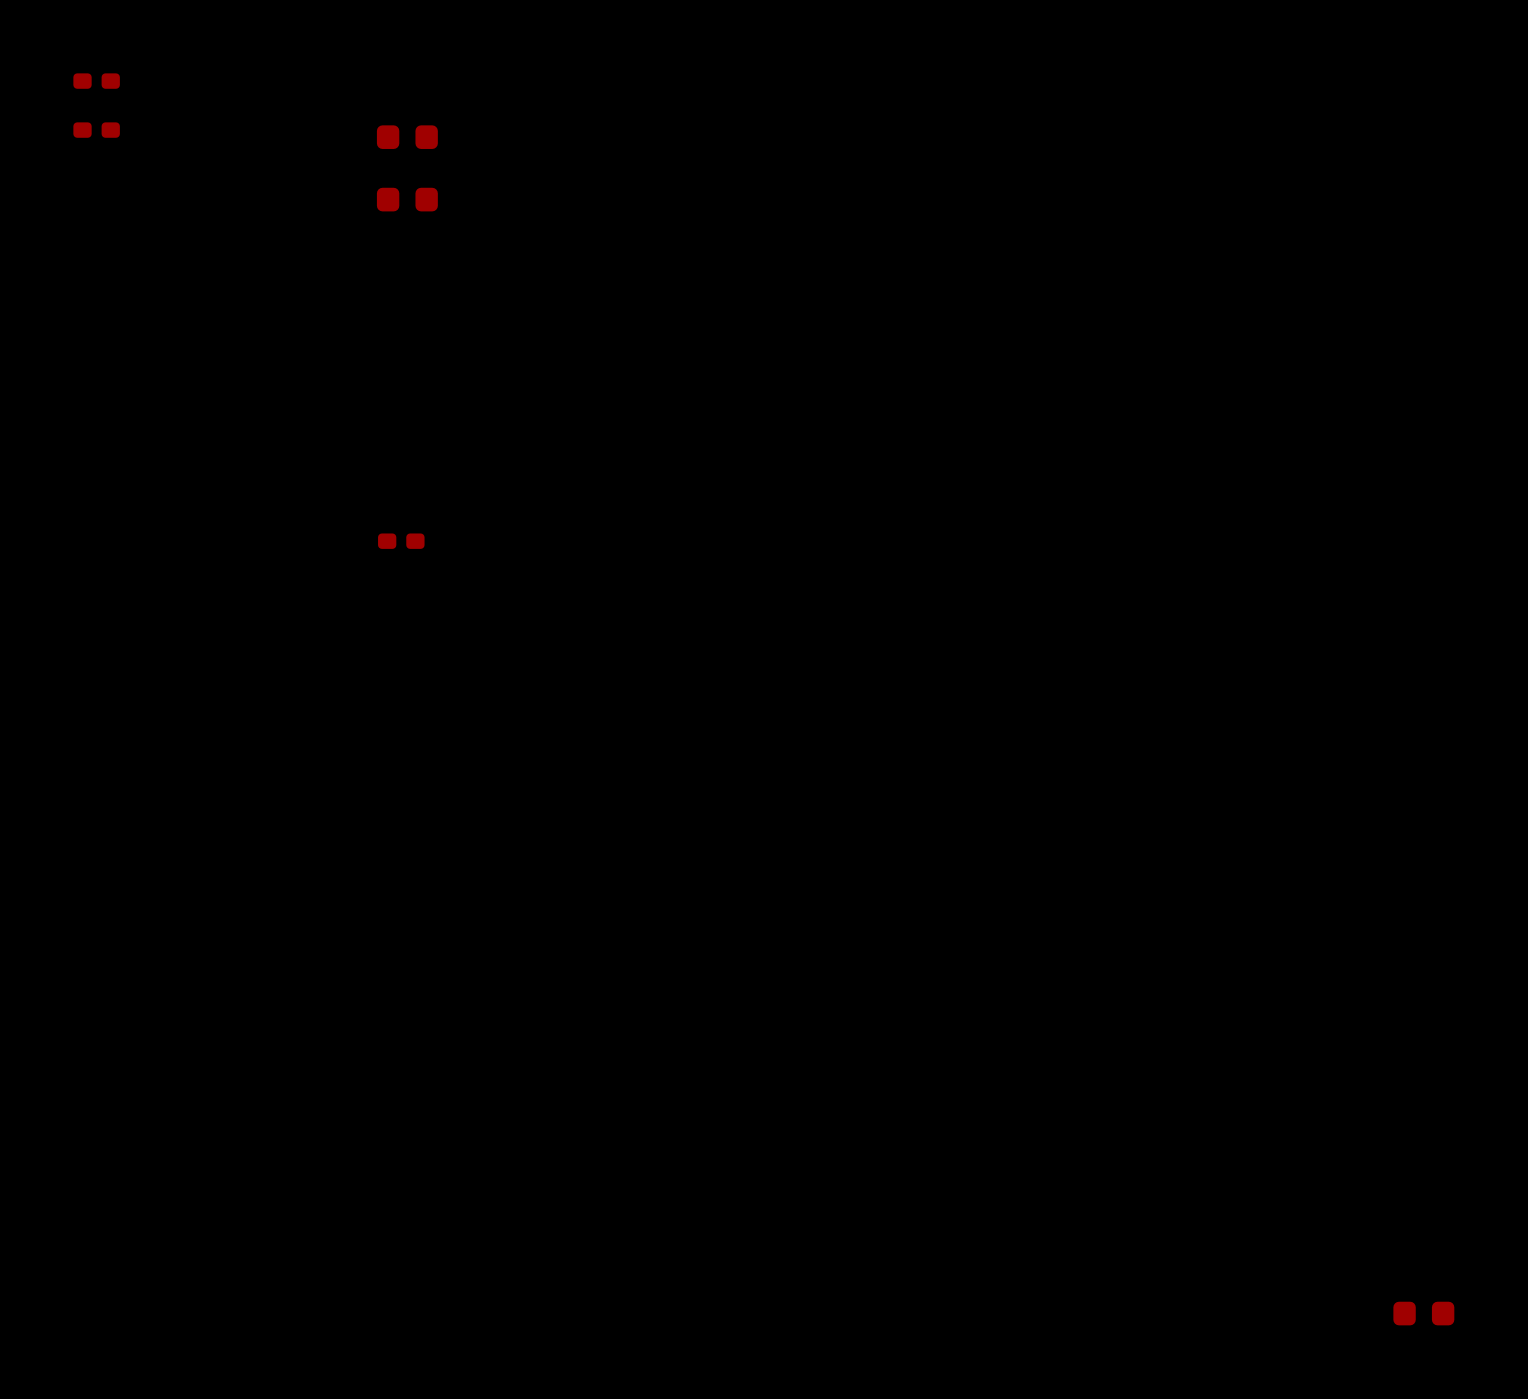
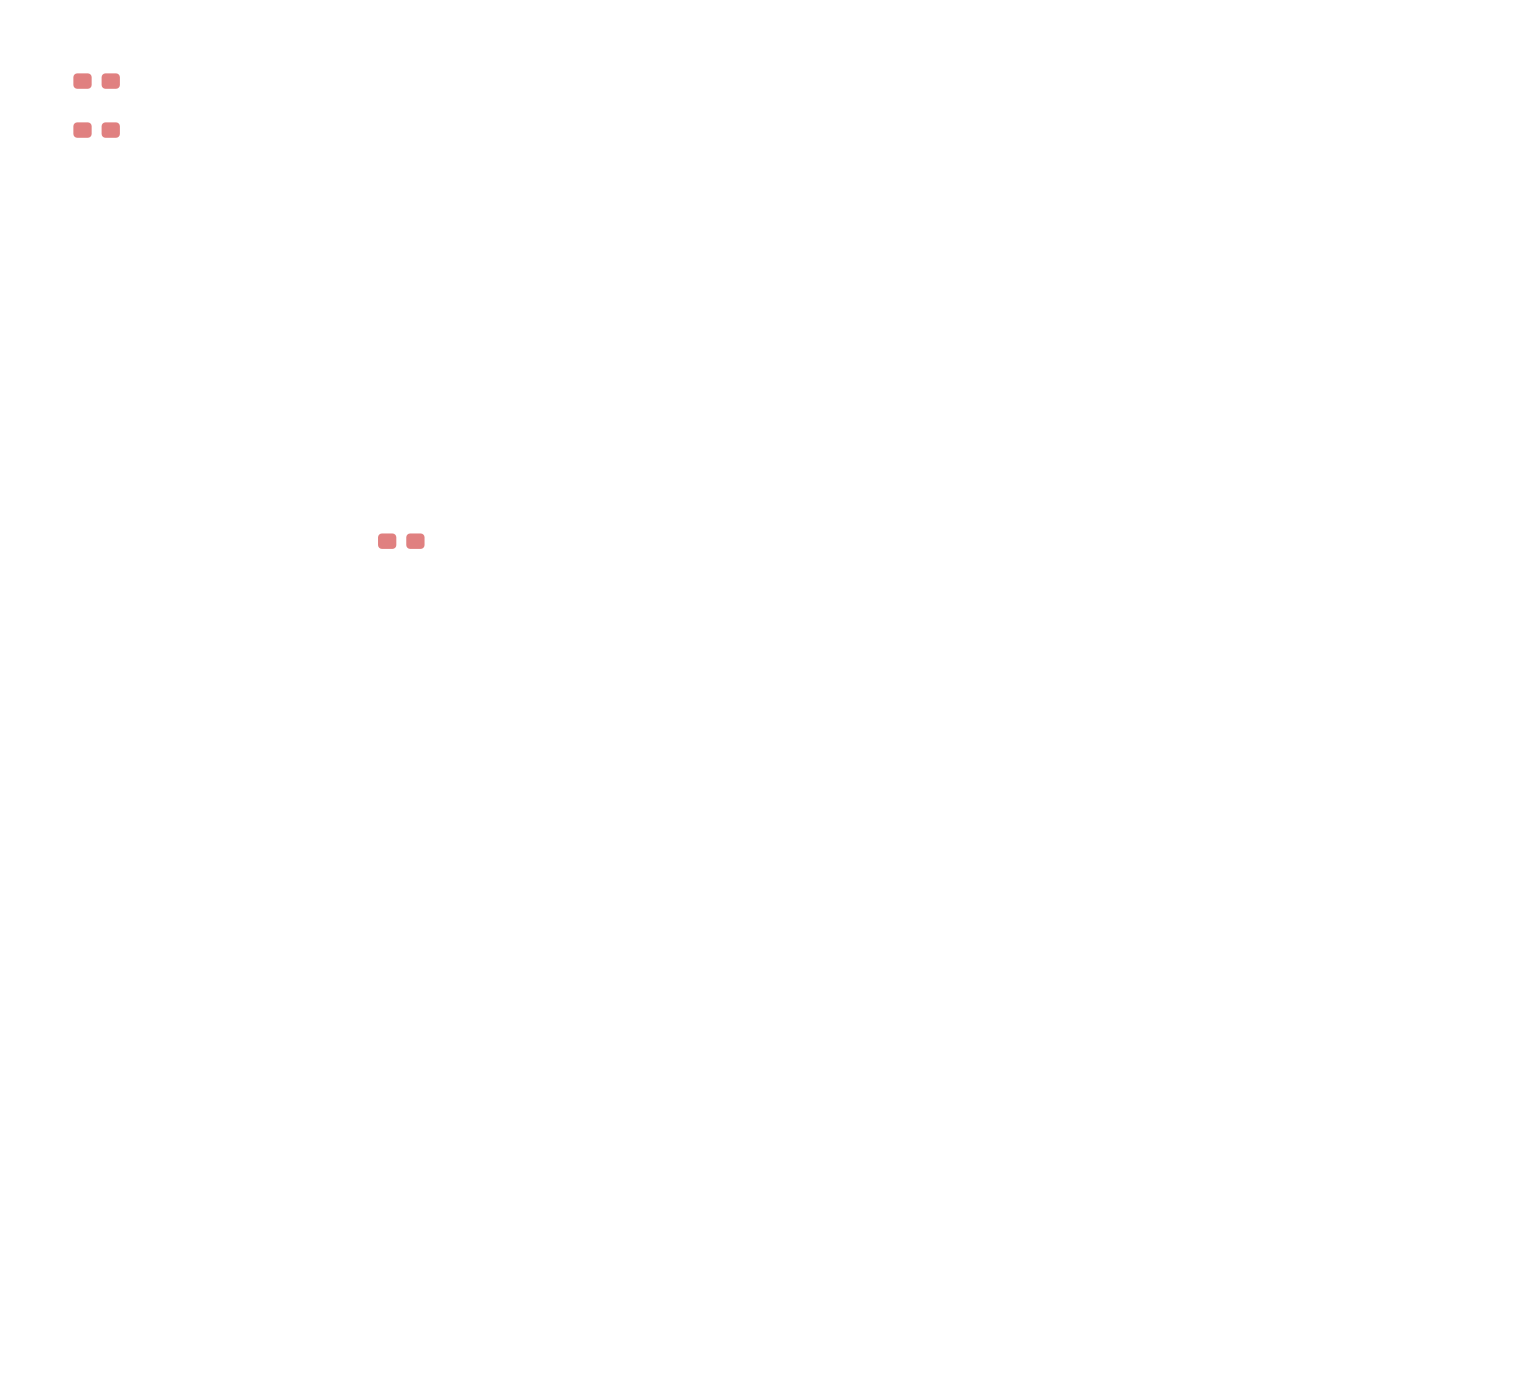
part: (407, 137) -> none
part: (407, 199) -> none
part: (1423, 1313) -> none

